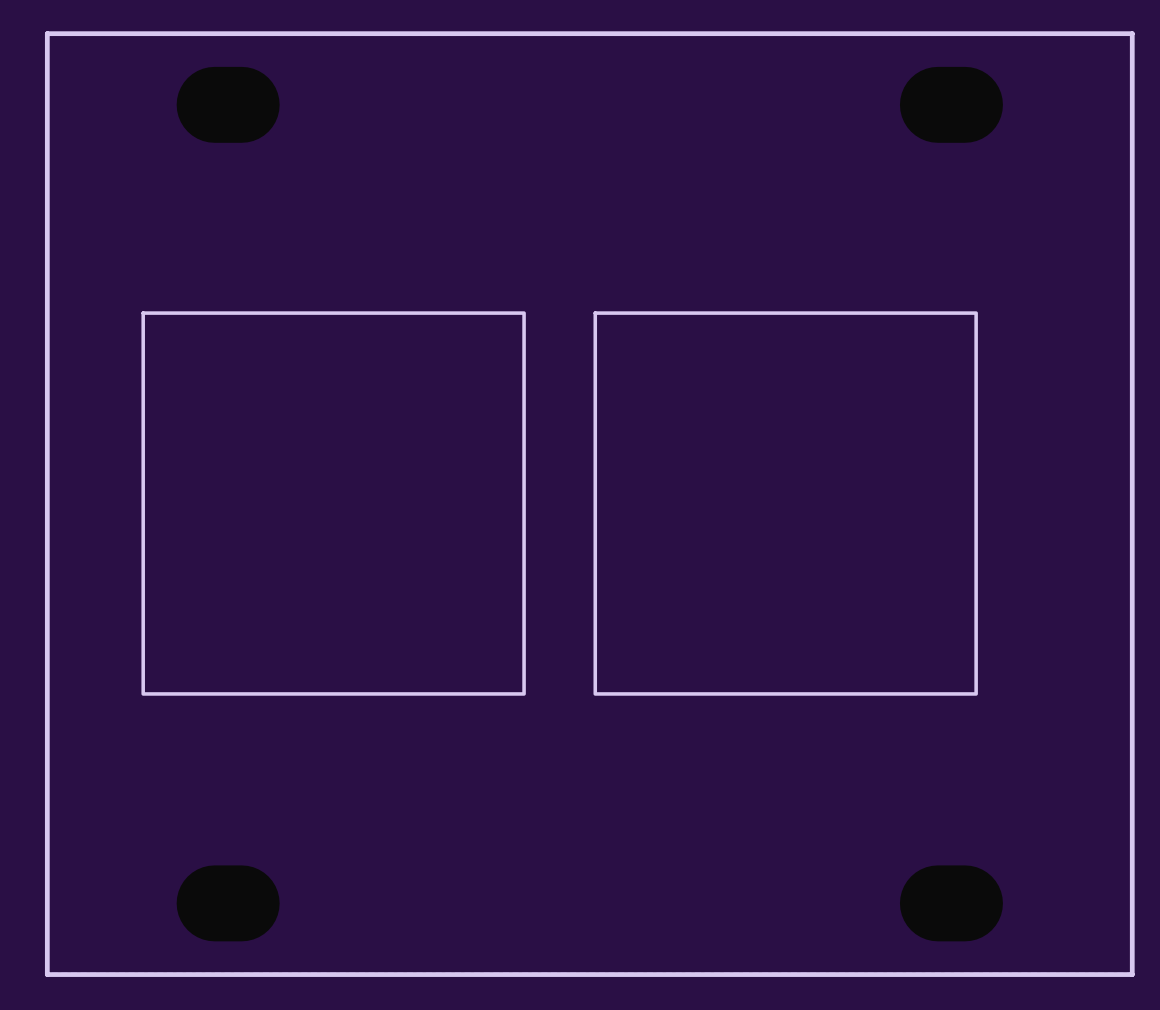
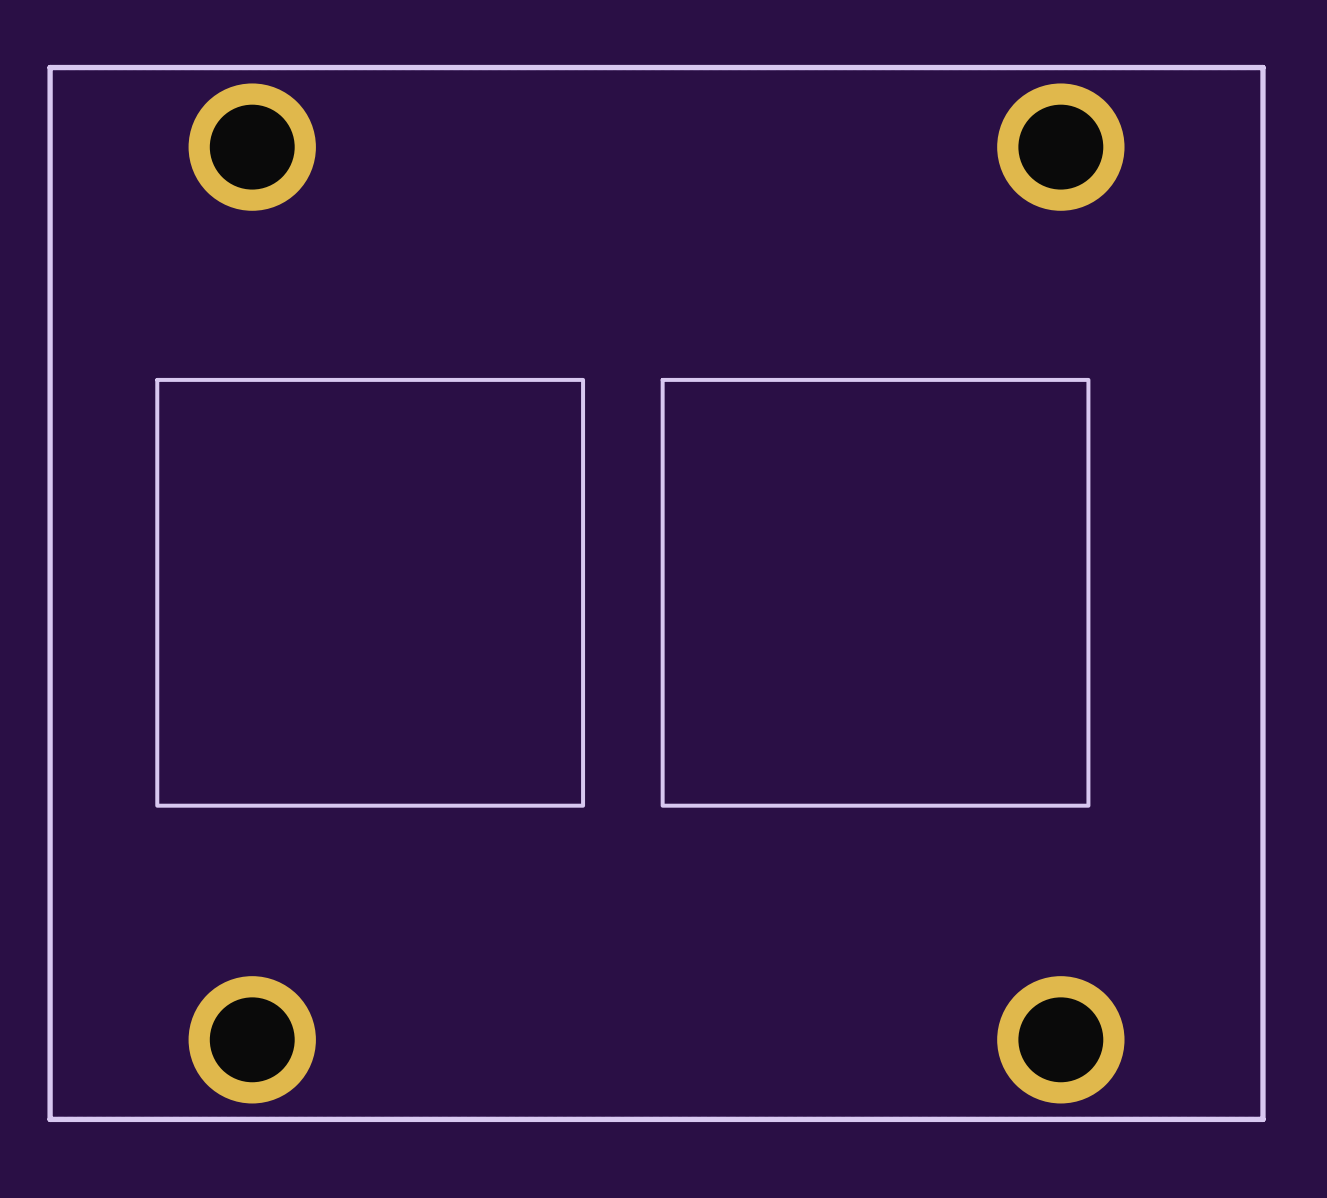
part footprint: [176, 66, 280, 143] -> [188, 83, 316, 211]
part footprint: [899, 66, 1003, 143] -> [997, 83, 1125, 211]
part footprint: [176, 865, 280, 942] -> [188, 976, 316, 1104]
part footprint: [899, 865, 1003, 942] -> [997, 976, 1125, 1104]

